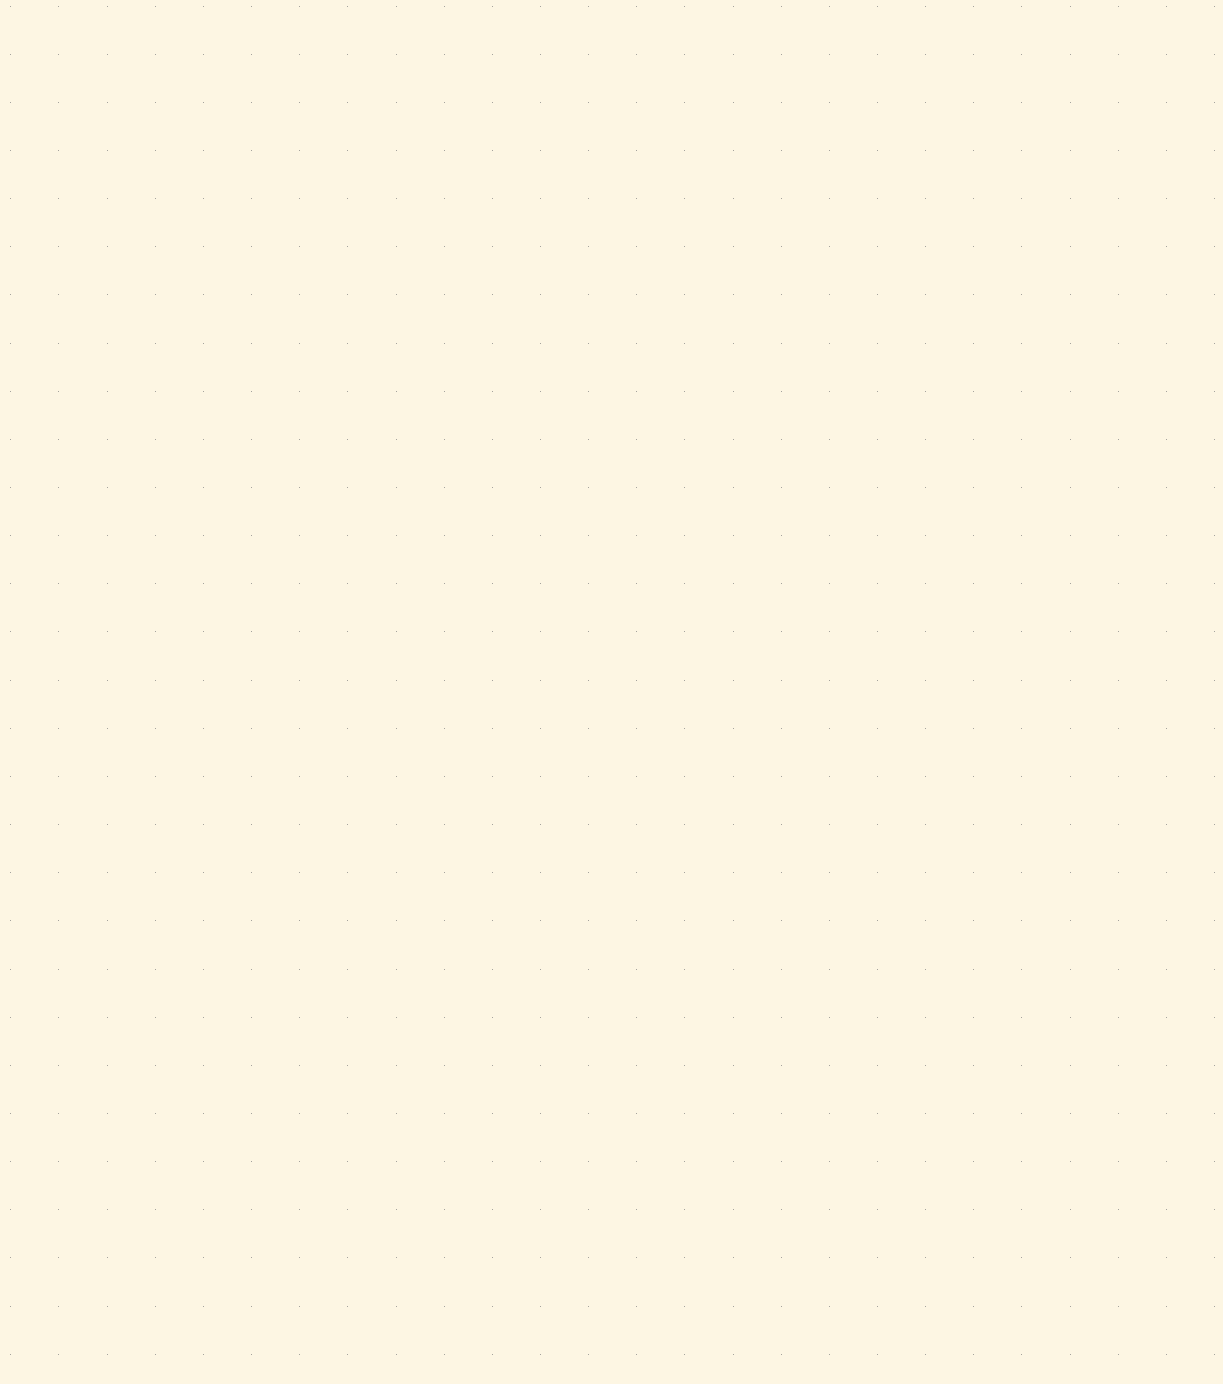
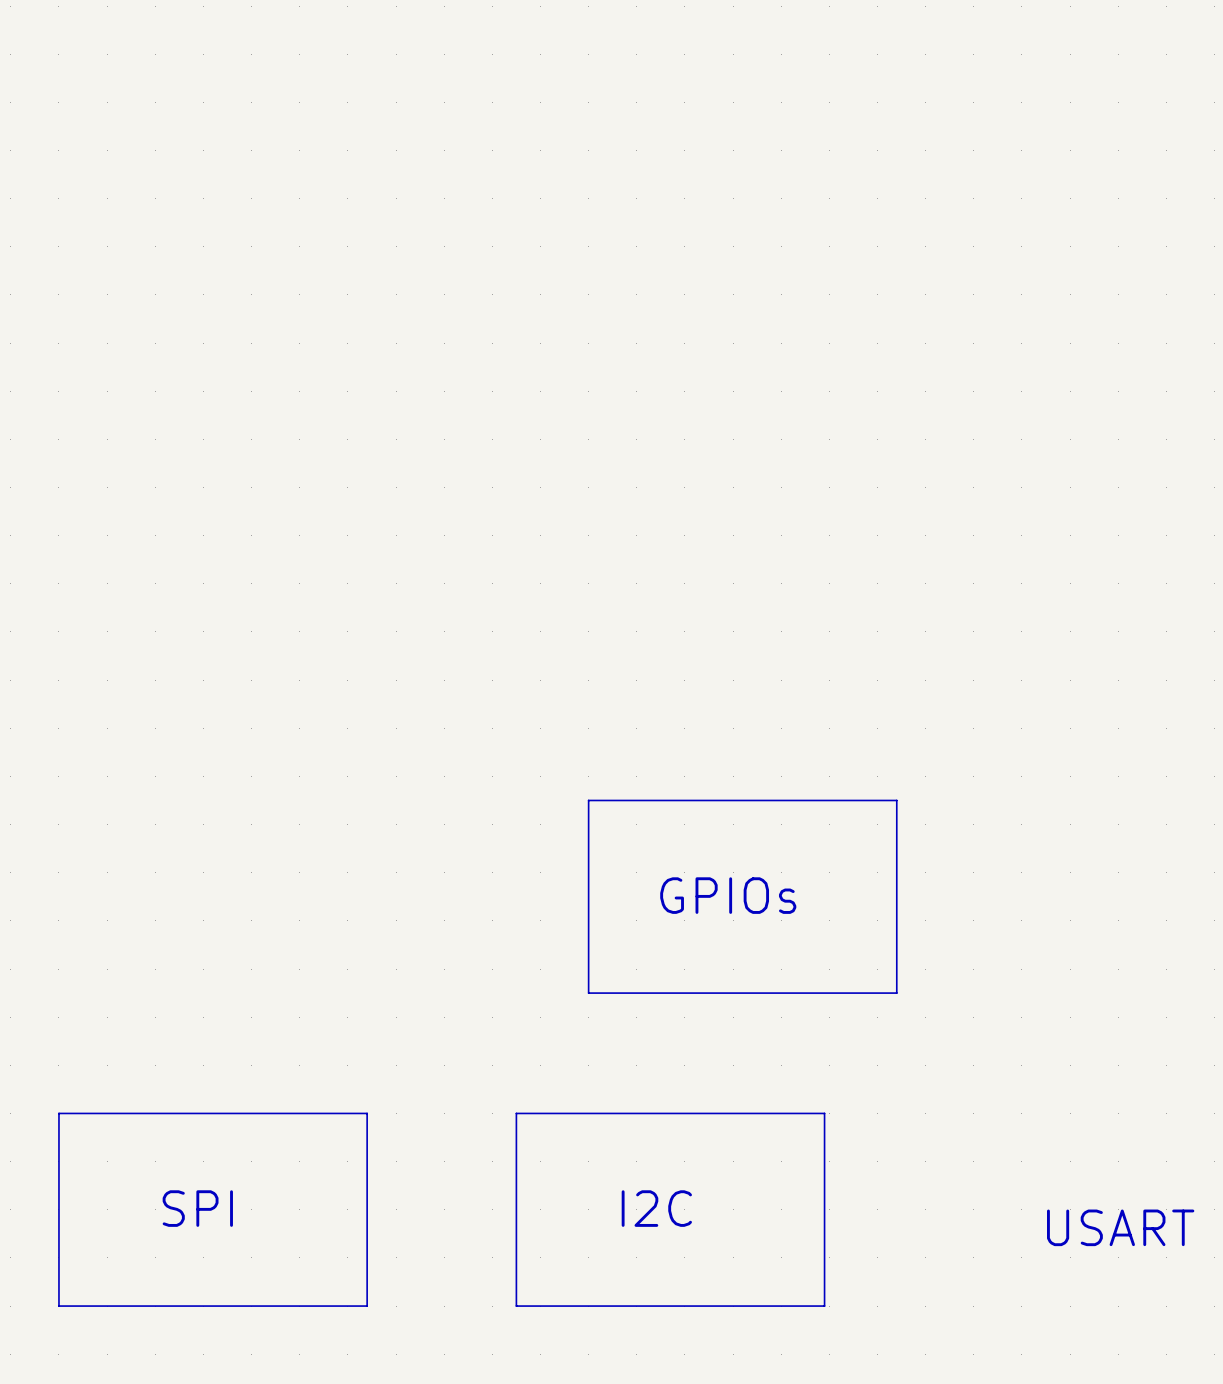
line: none -> (588, 800) (896, 800) (896, 993) (588, 993) (588, 800)
text: none -> GPIOs (728, 895)
line: none -> (58, 1113) (58, 1306) (367, 1306) (367, 1113) (58, 1113)
line: none -> (516, 1113) (824, 1113) (824, 1306) (516, 1306) (516, 1113)
text: none -> SPI (197, 1208)
text: none -> I2C (656, 1208)
text: none -> USART (1120, 1227)

